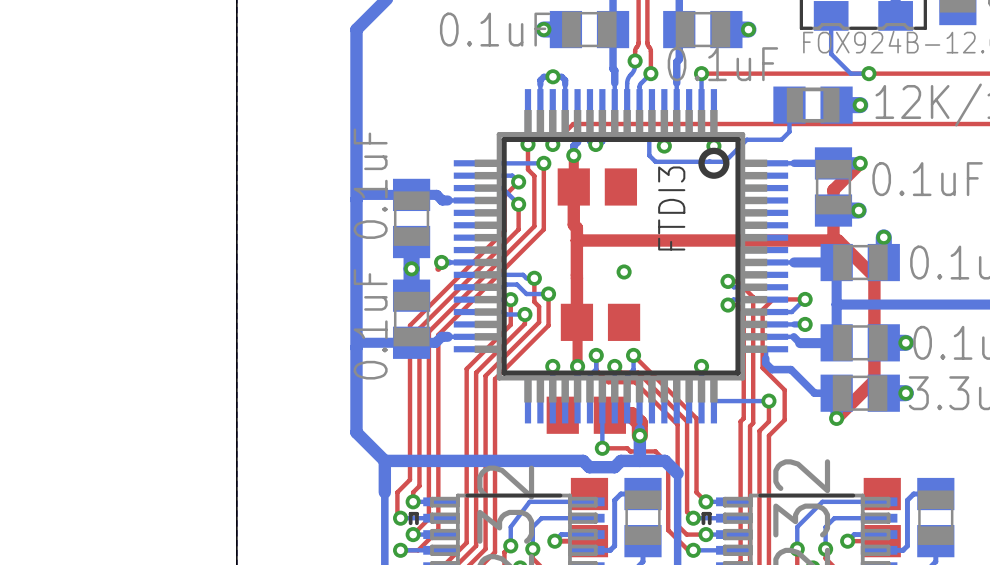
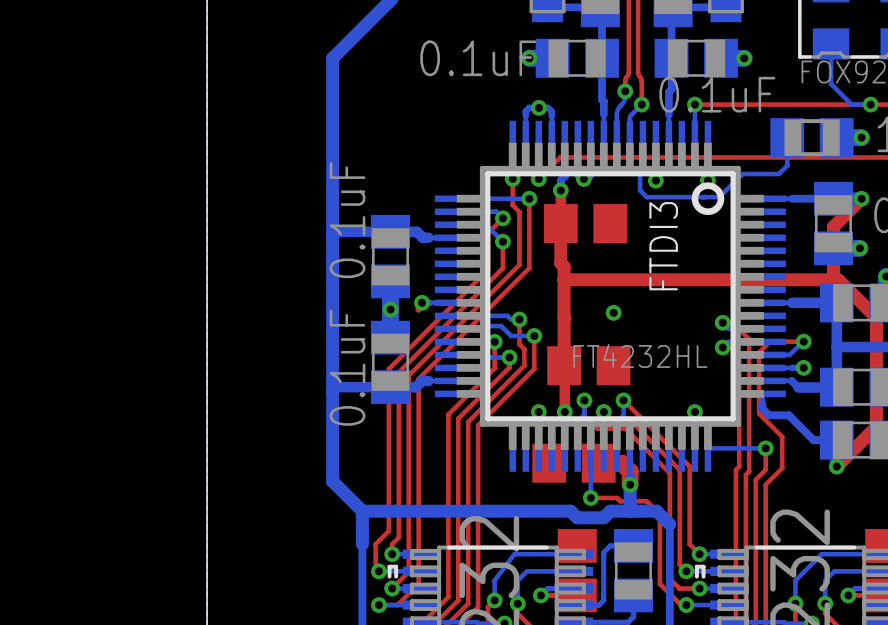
FTDI3 value: none -> FT4232HL (640, 355)

